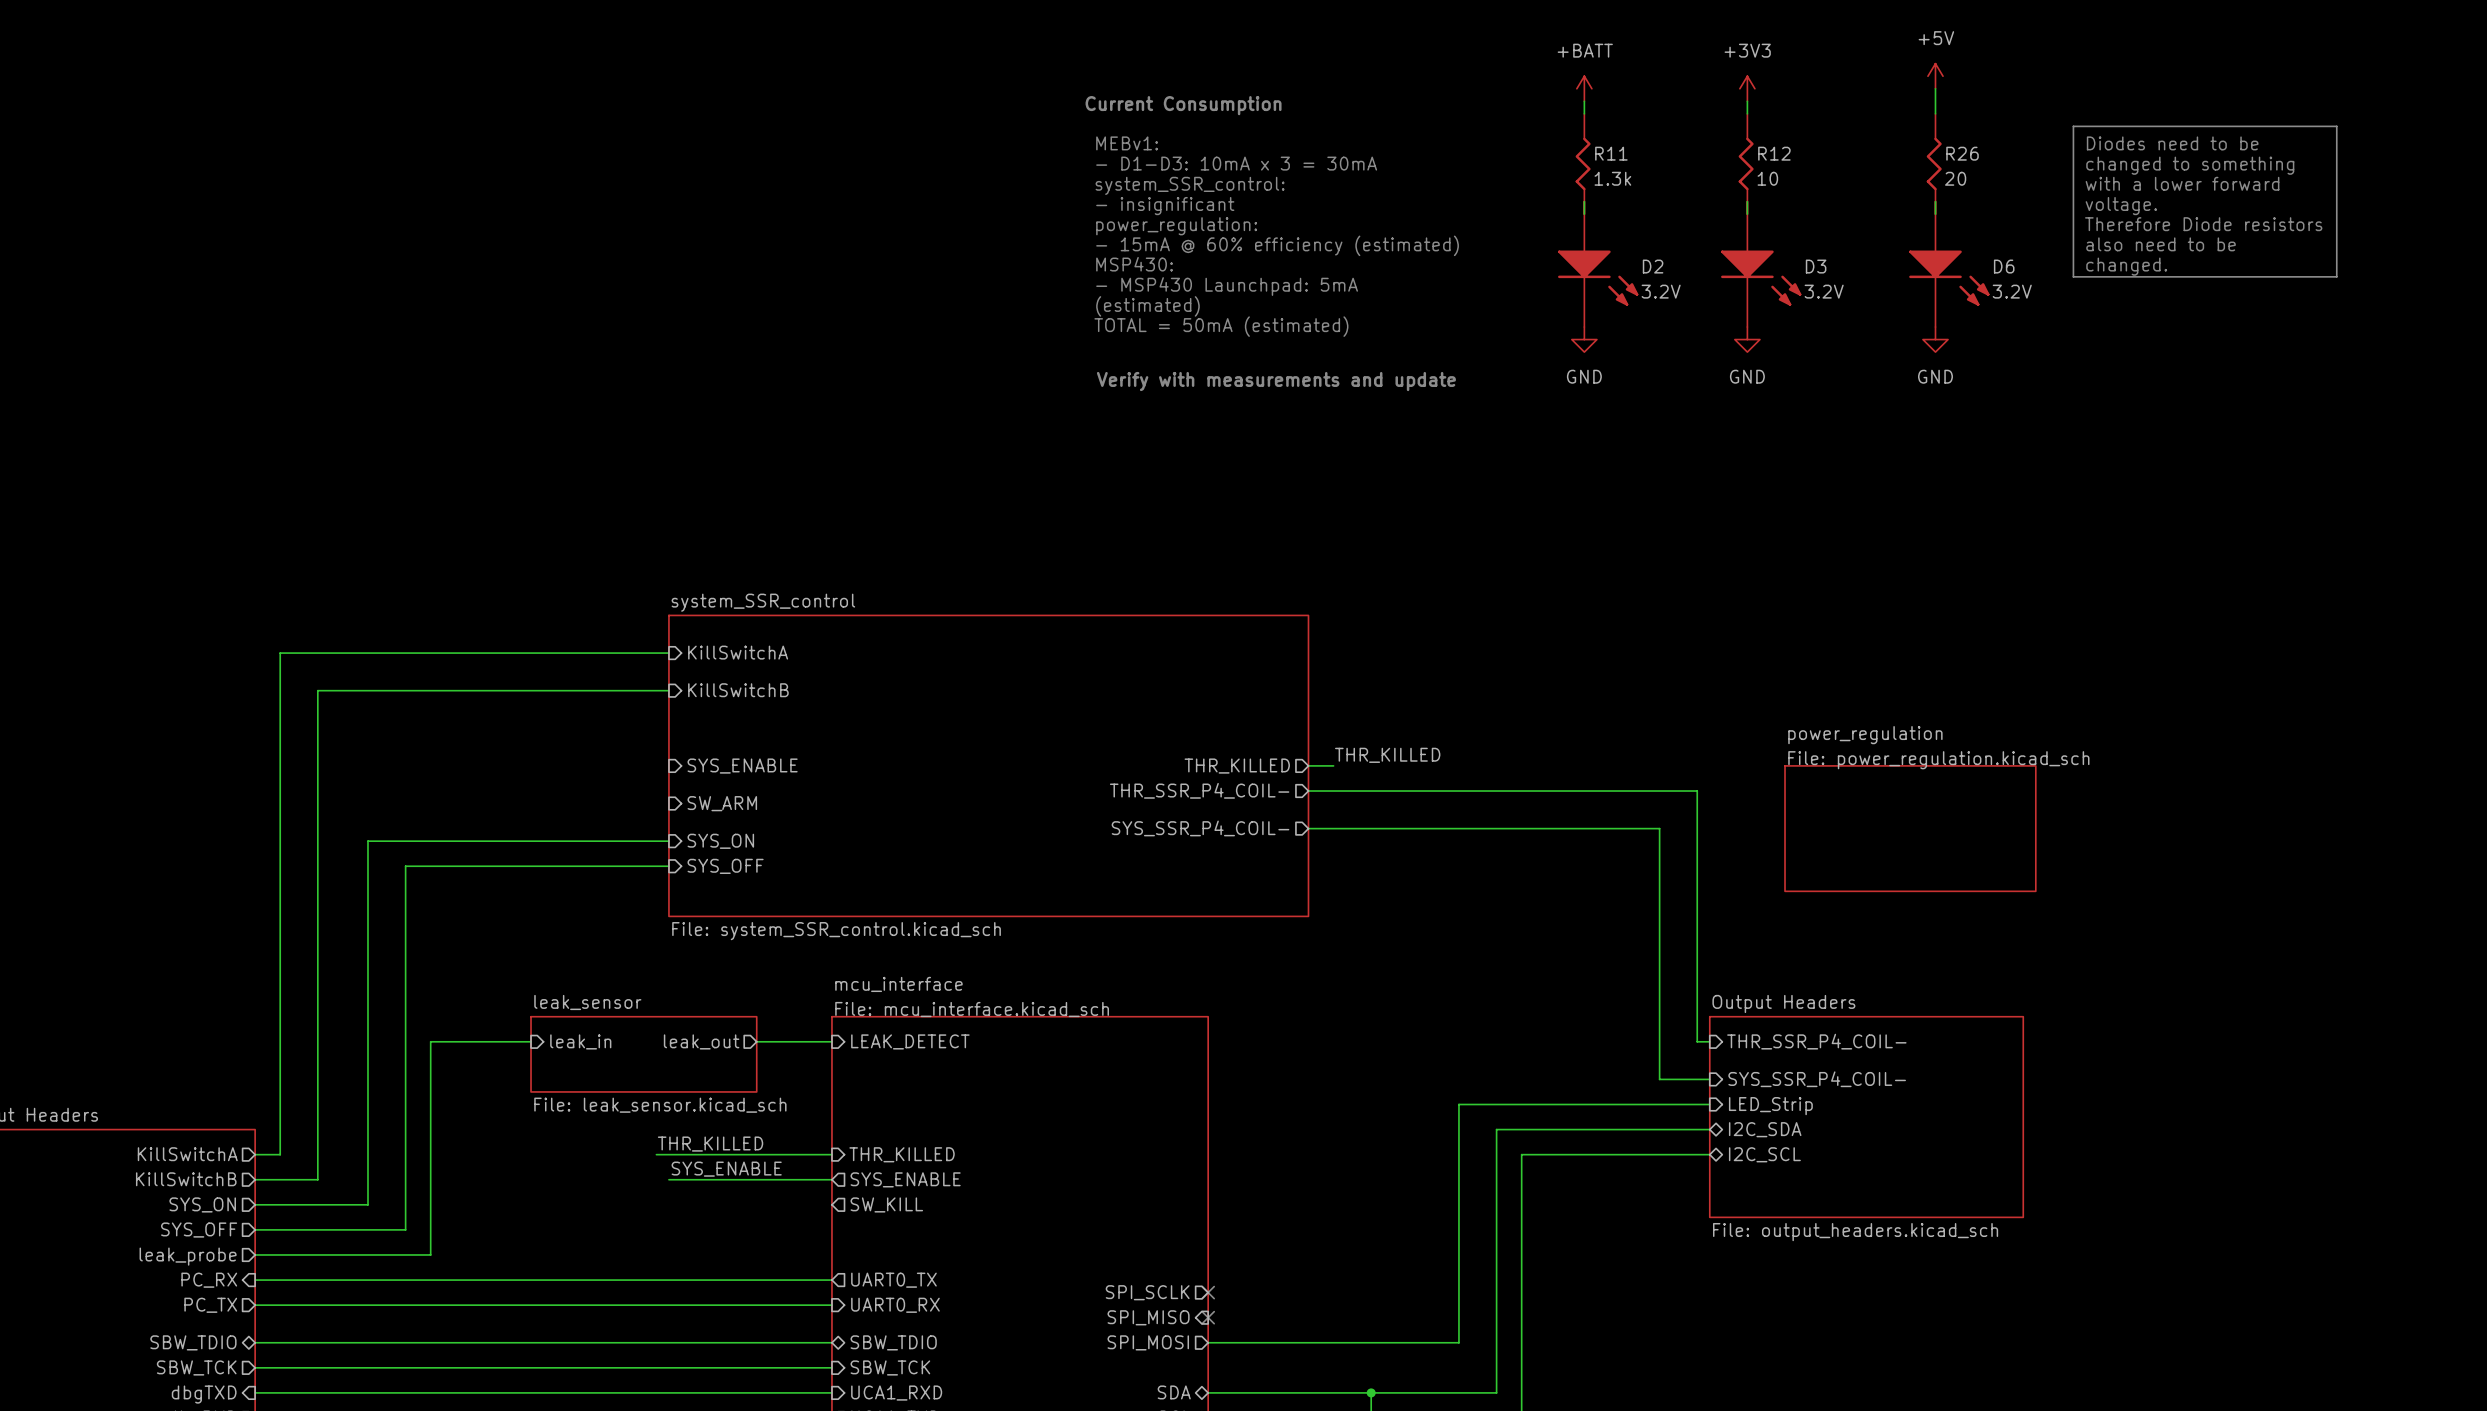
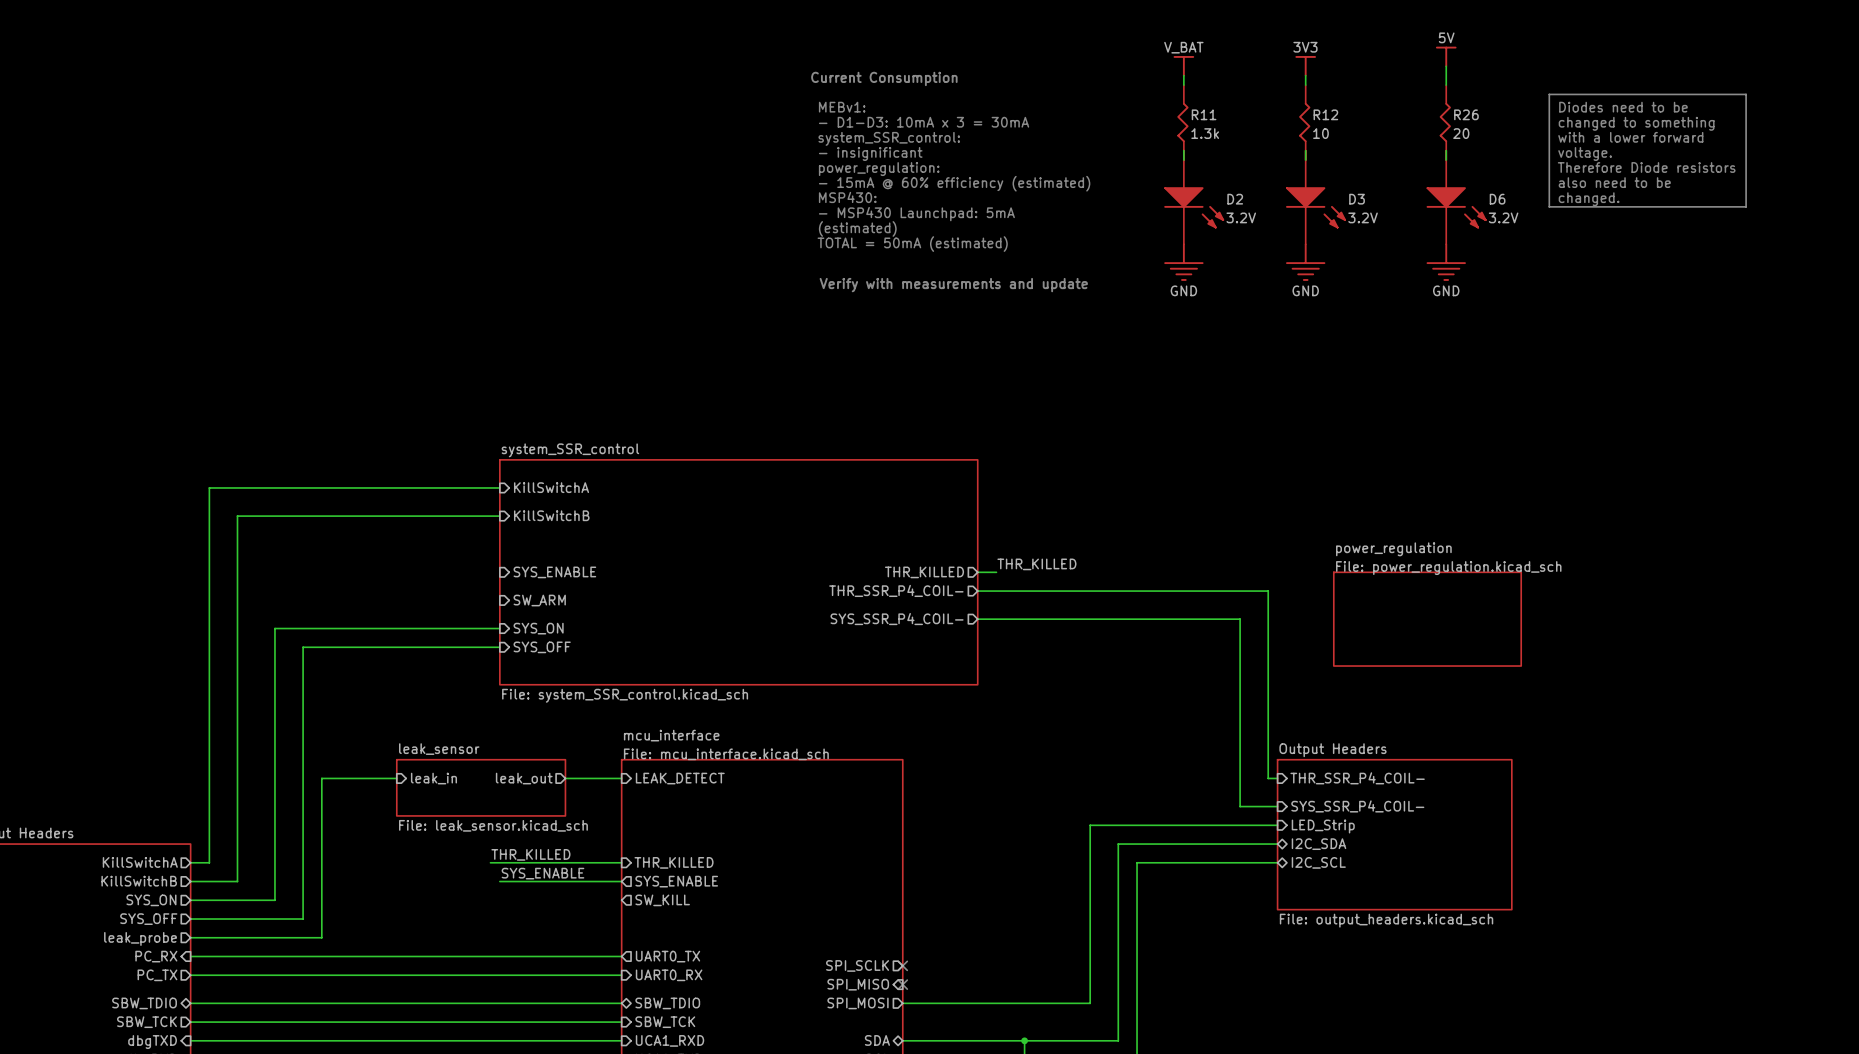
power symbol: +5V (1935, 76) -> 5V (1446, 56)
power symbol: +BATT (1584, 88) -> V_BAT (1183, 66)
power symbol: +3V3 (1747, 88) -> 3V3 (1305, 66)
power symbol: GND (1584, 339) -> none
power symbol: GND (1747, 339) -> none
power symbol: GND (1935, 339) -> none
power symbol: none -> GND (1183, 262)
power symbol: none -> GND (1305, 262)
power symbol: none -> GND (1446, 262)

